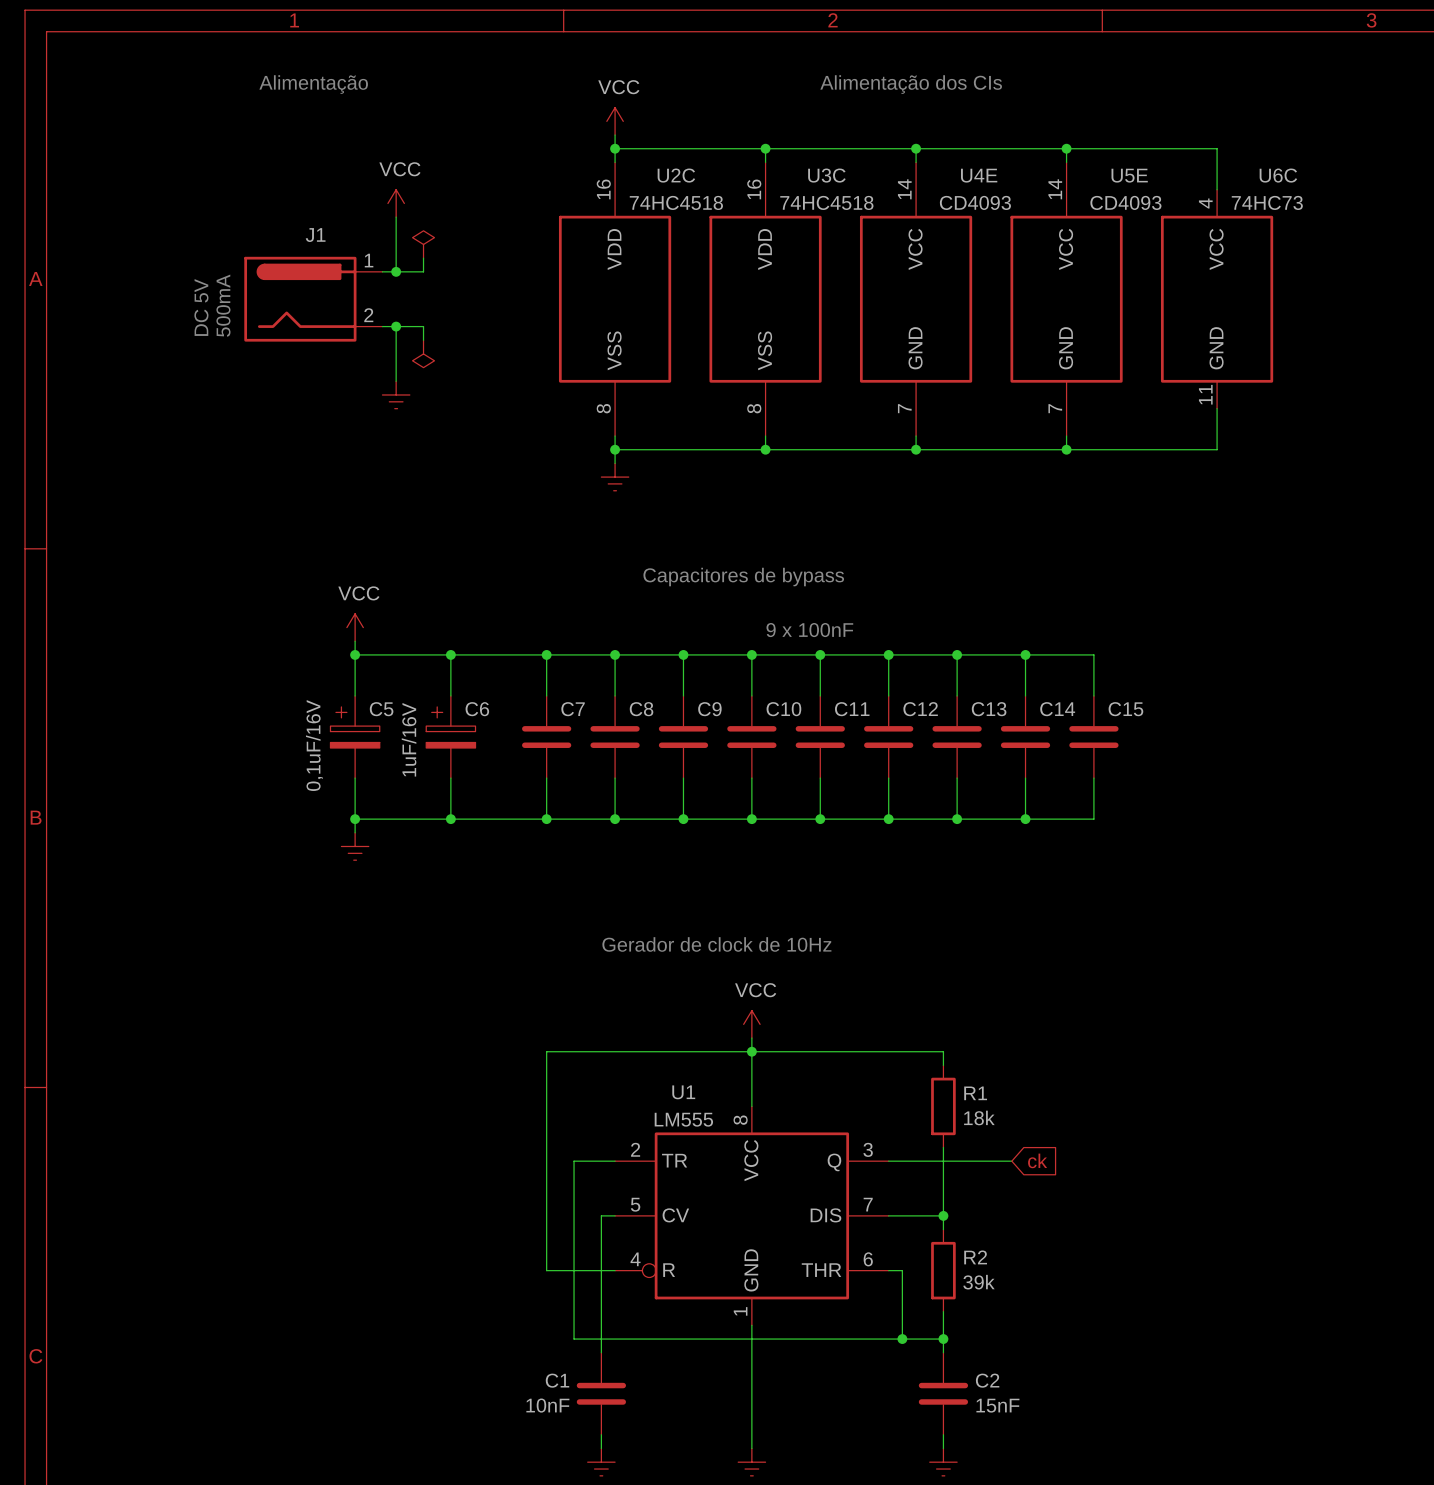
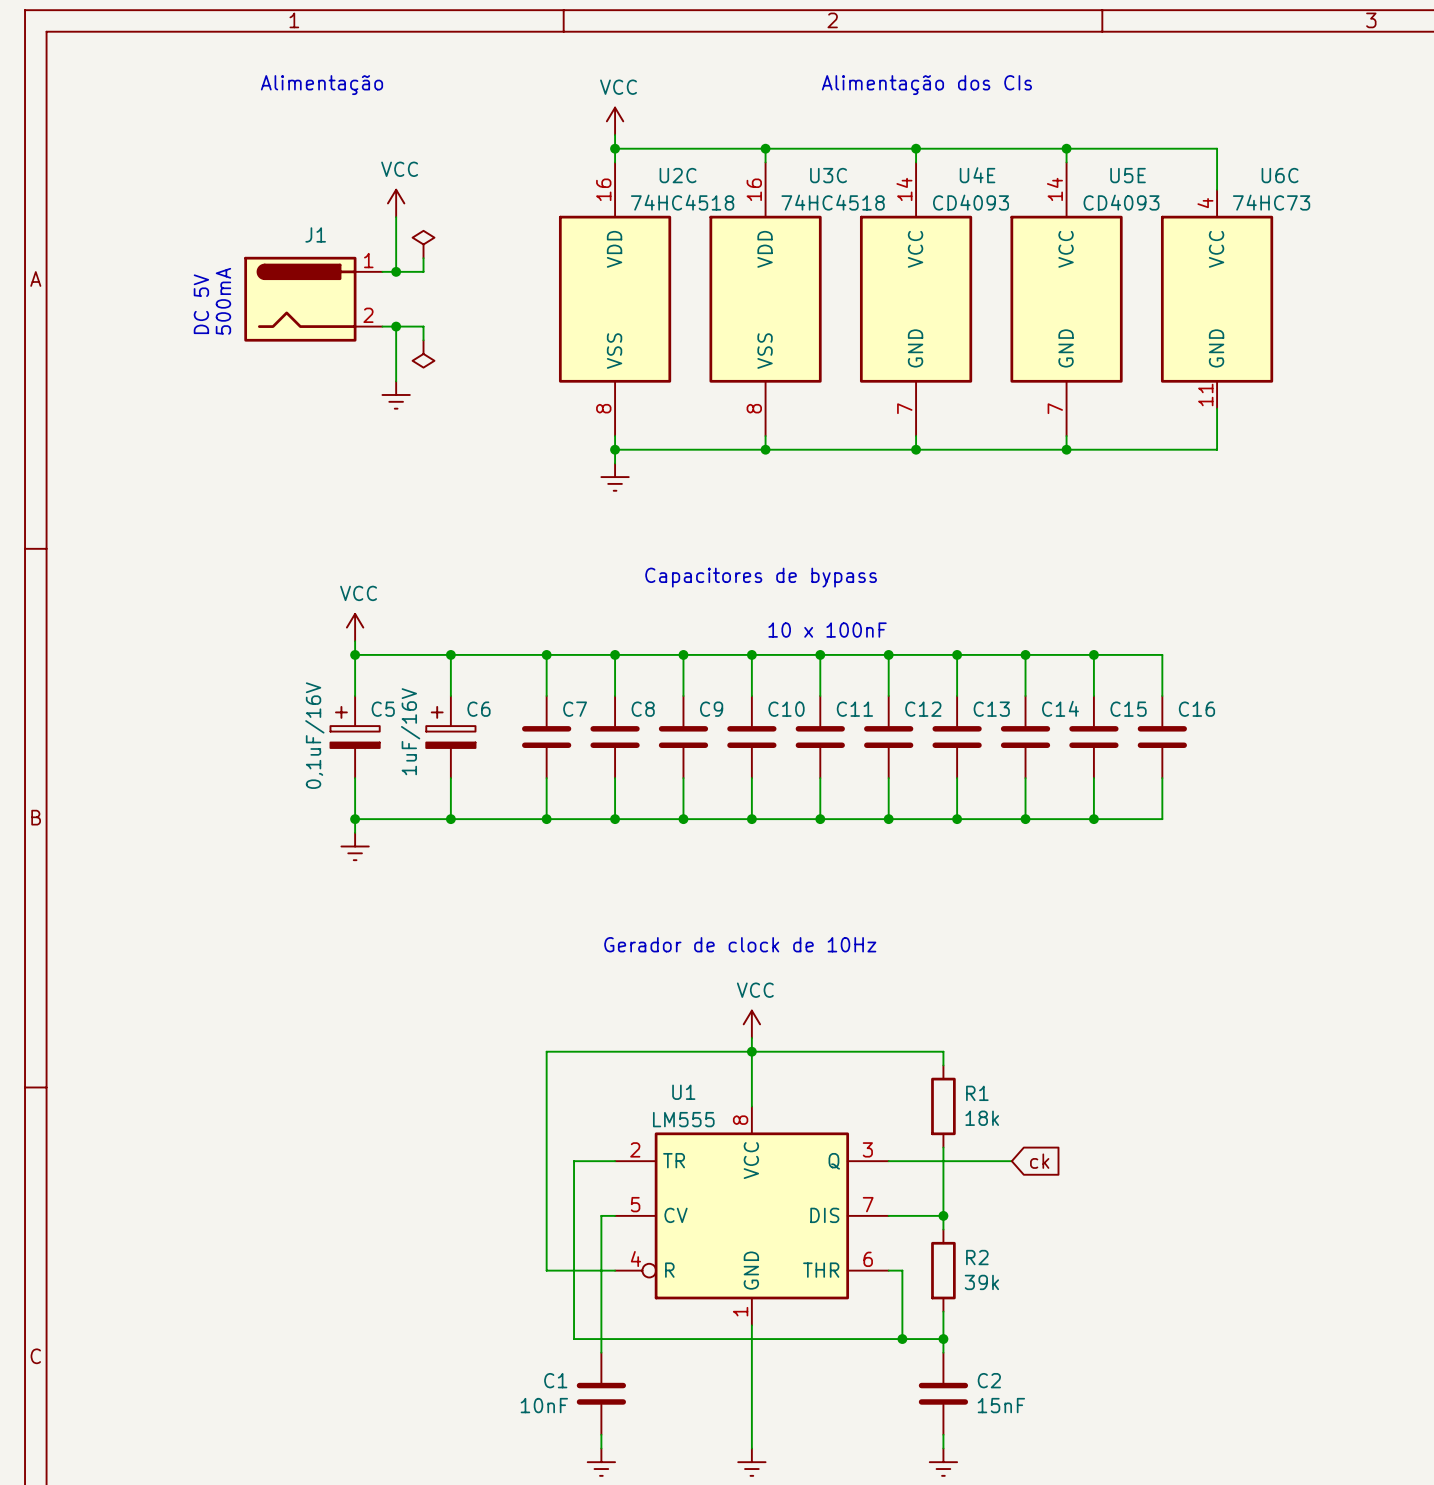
text: 9 x 100nF (809, 630) -> 10 x 100nF (827, 630)
wire: none -> (1093, 654) (1162, 654) (1162, 695)
junction: none -> (1093, 654)
C16: none -> (1162, 737)
wire: none -> (1162, 778) (1162, 819) (1093, 819)
junction: none -> (1093, 819)

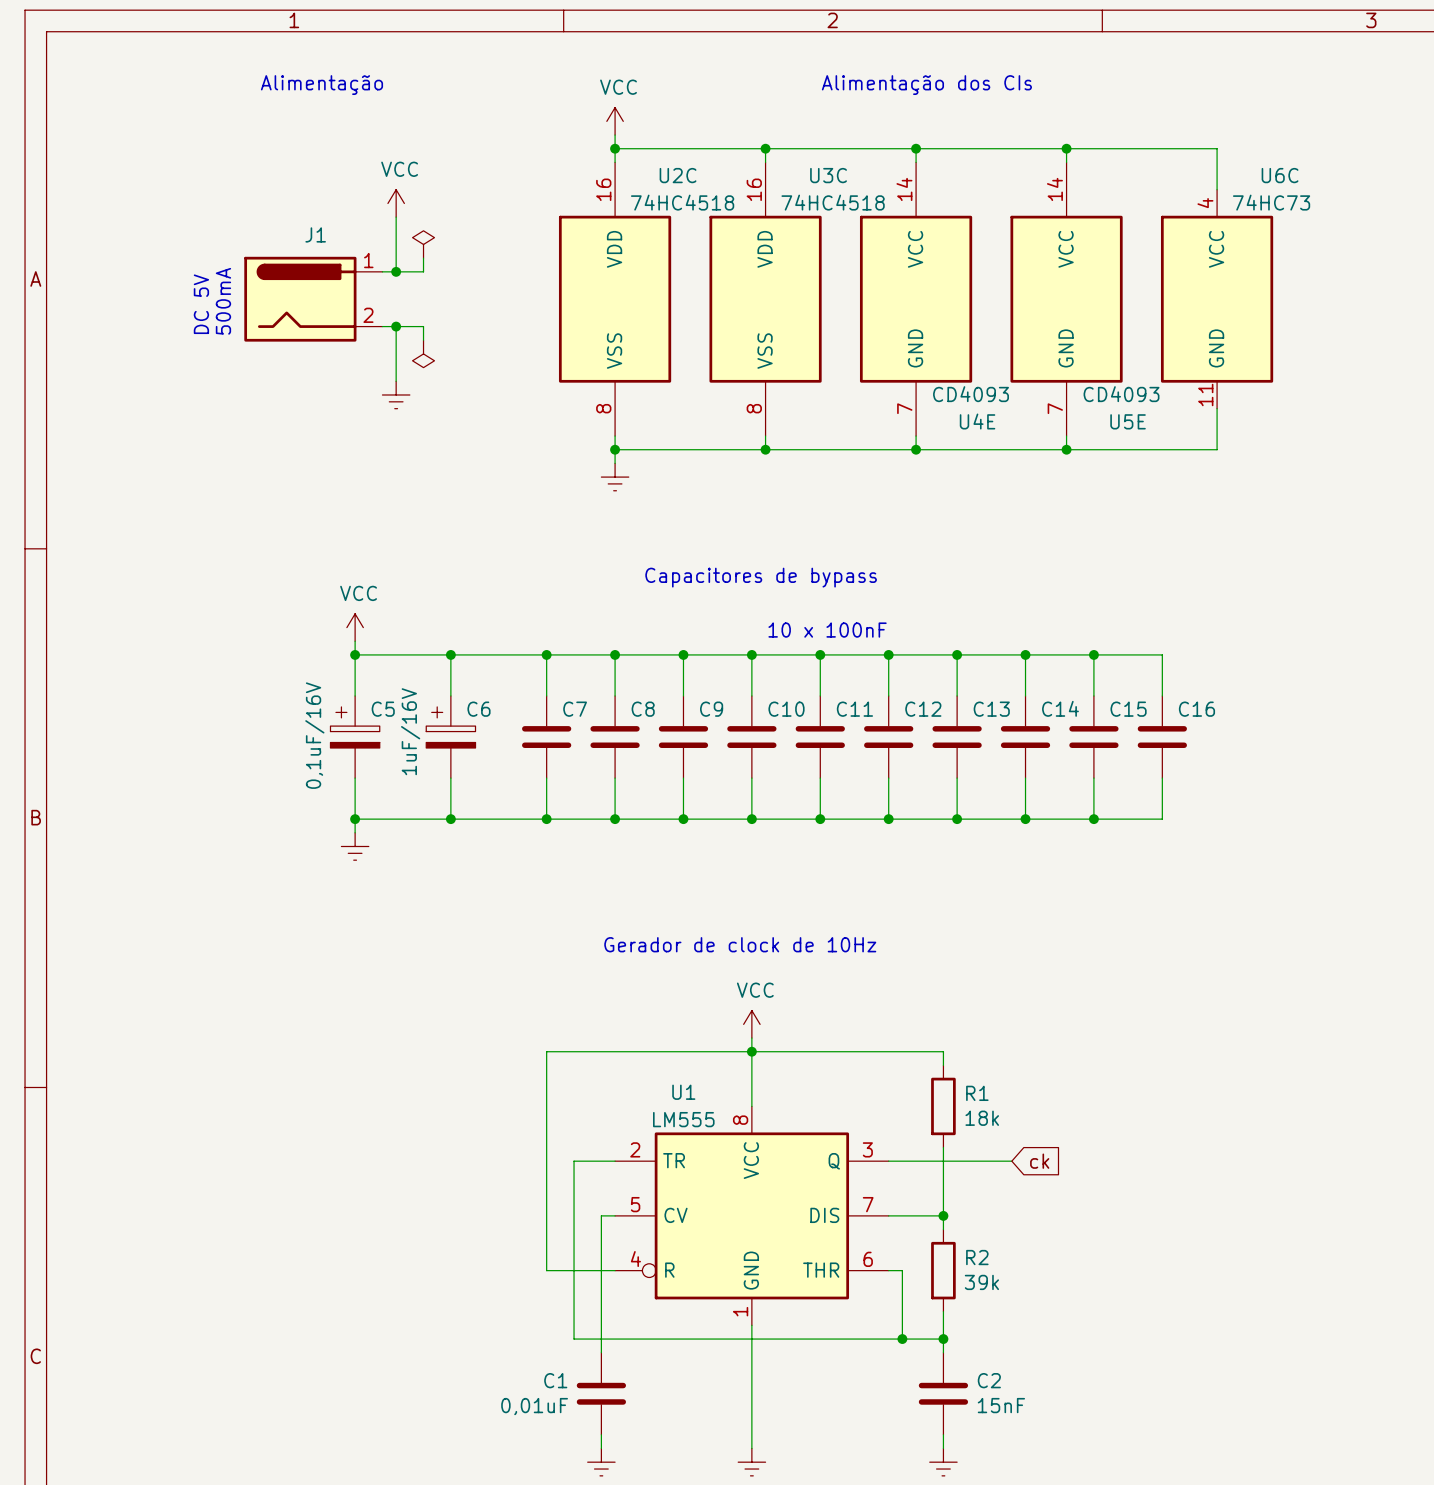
U4E name position: U4E (977, 175) -> U4E (977, 421)
U5E name position: U5E (1128, 175) -> U5E (1128, 421)
U4E value position: CD4093 (971, 202) -> CD4093 (971, 394)
U5E value position: CD4093 (1121, 202) -> CD4093 (1121, 394)
C1 value: 10nF (544, 1405) -> 0,01uF (534, 1406)

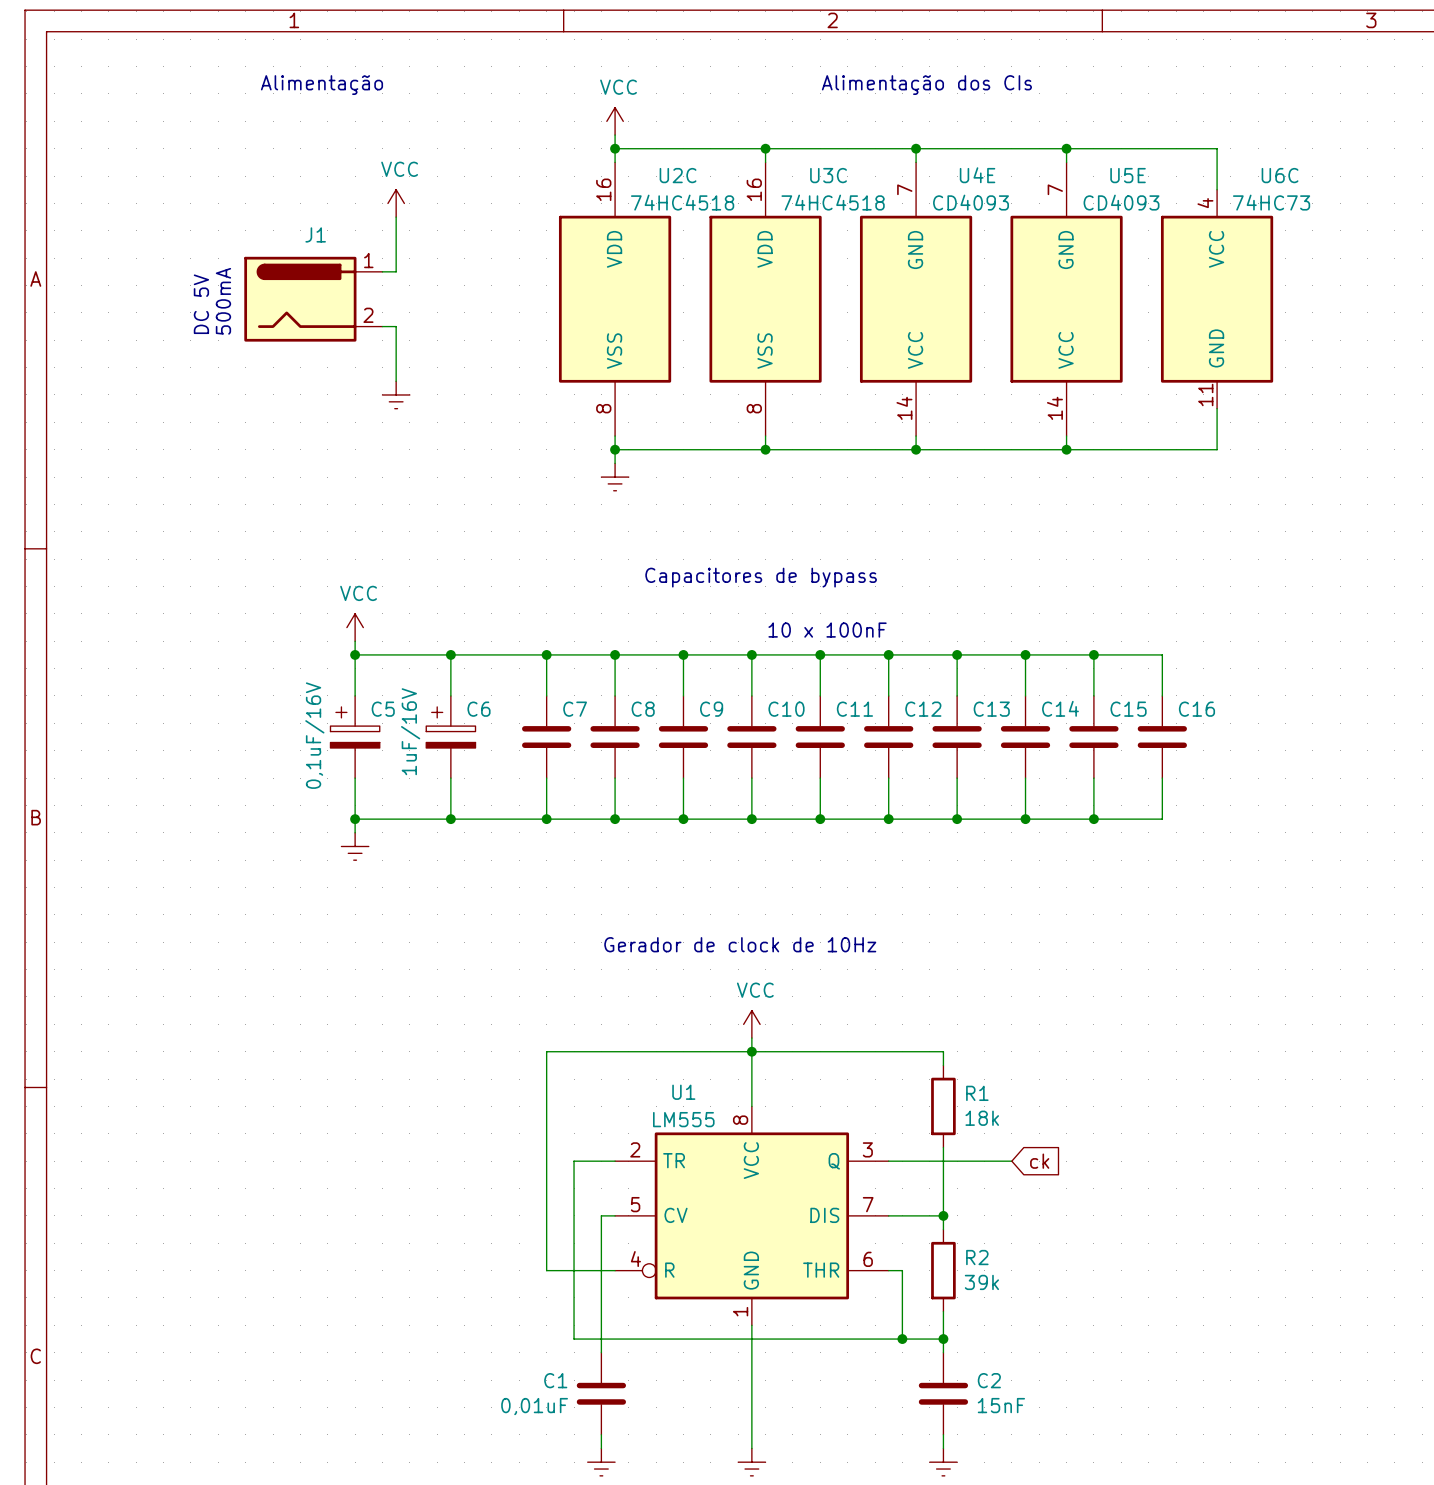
power symbol: (423, 244) -> none
wire: (423, 258) (423, 271) (396, 271) -> none
junction: (396, 271) -> none
U4E rotation: 0° (916, 299) -> 180° (916, 299)
U5E rotation: 0° (1066, 299) -> 180° (1066, 299)
wire: (396, 326) (423, 326) (423, 340) -> none
junction: (396, 326) -> none
power symbol: (423, 353) -> none
U4E value position: CD4093 (971, 394) -> CD4093 (971, 202)
U5E value position: CD4093 (1121, 394) -> CD4093 (1121, 202)
U4E name position: U4E (977, 421) -> U4E (977, 175)
U5E name position: U5E (1128, 421) -> U5E (1128, 175)

